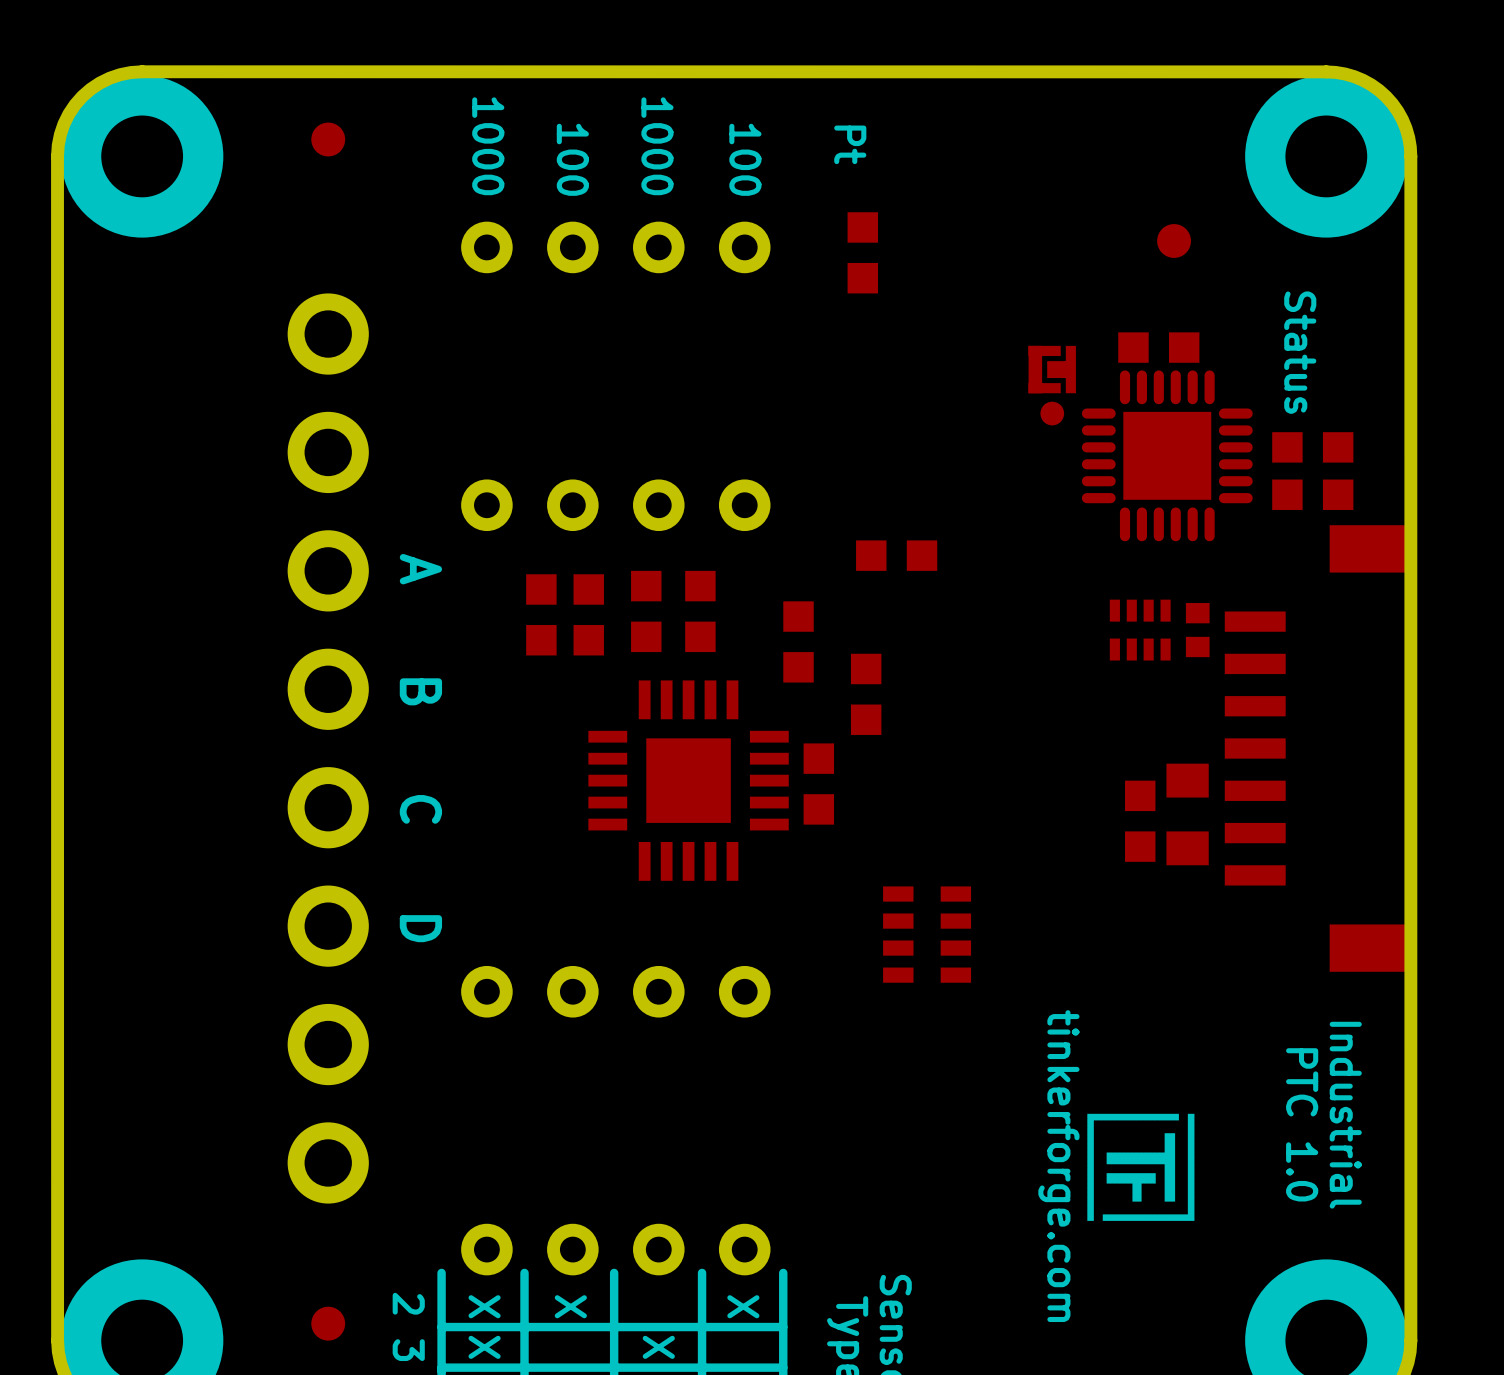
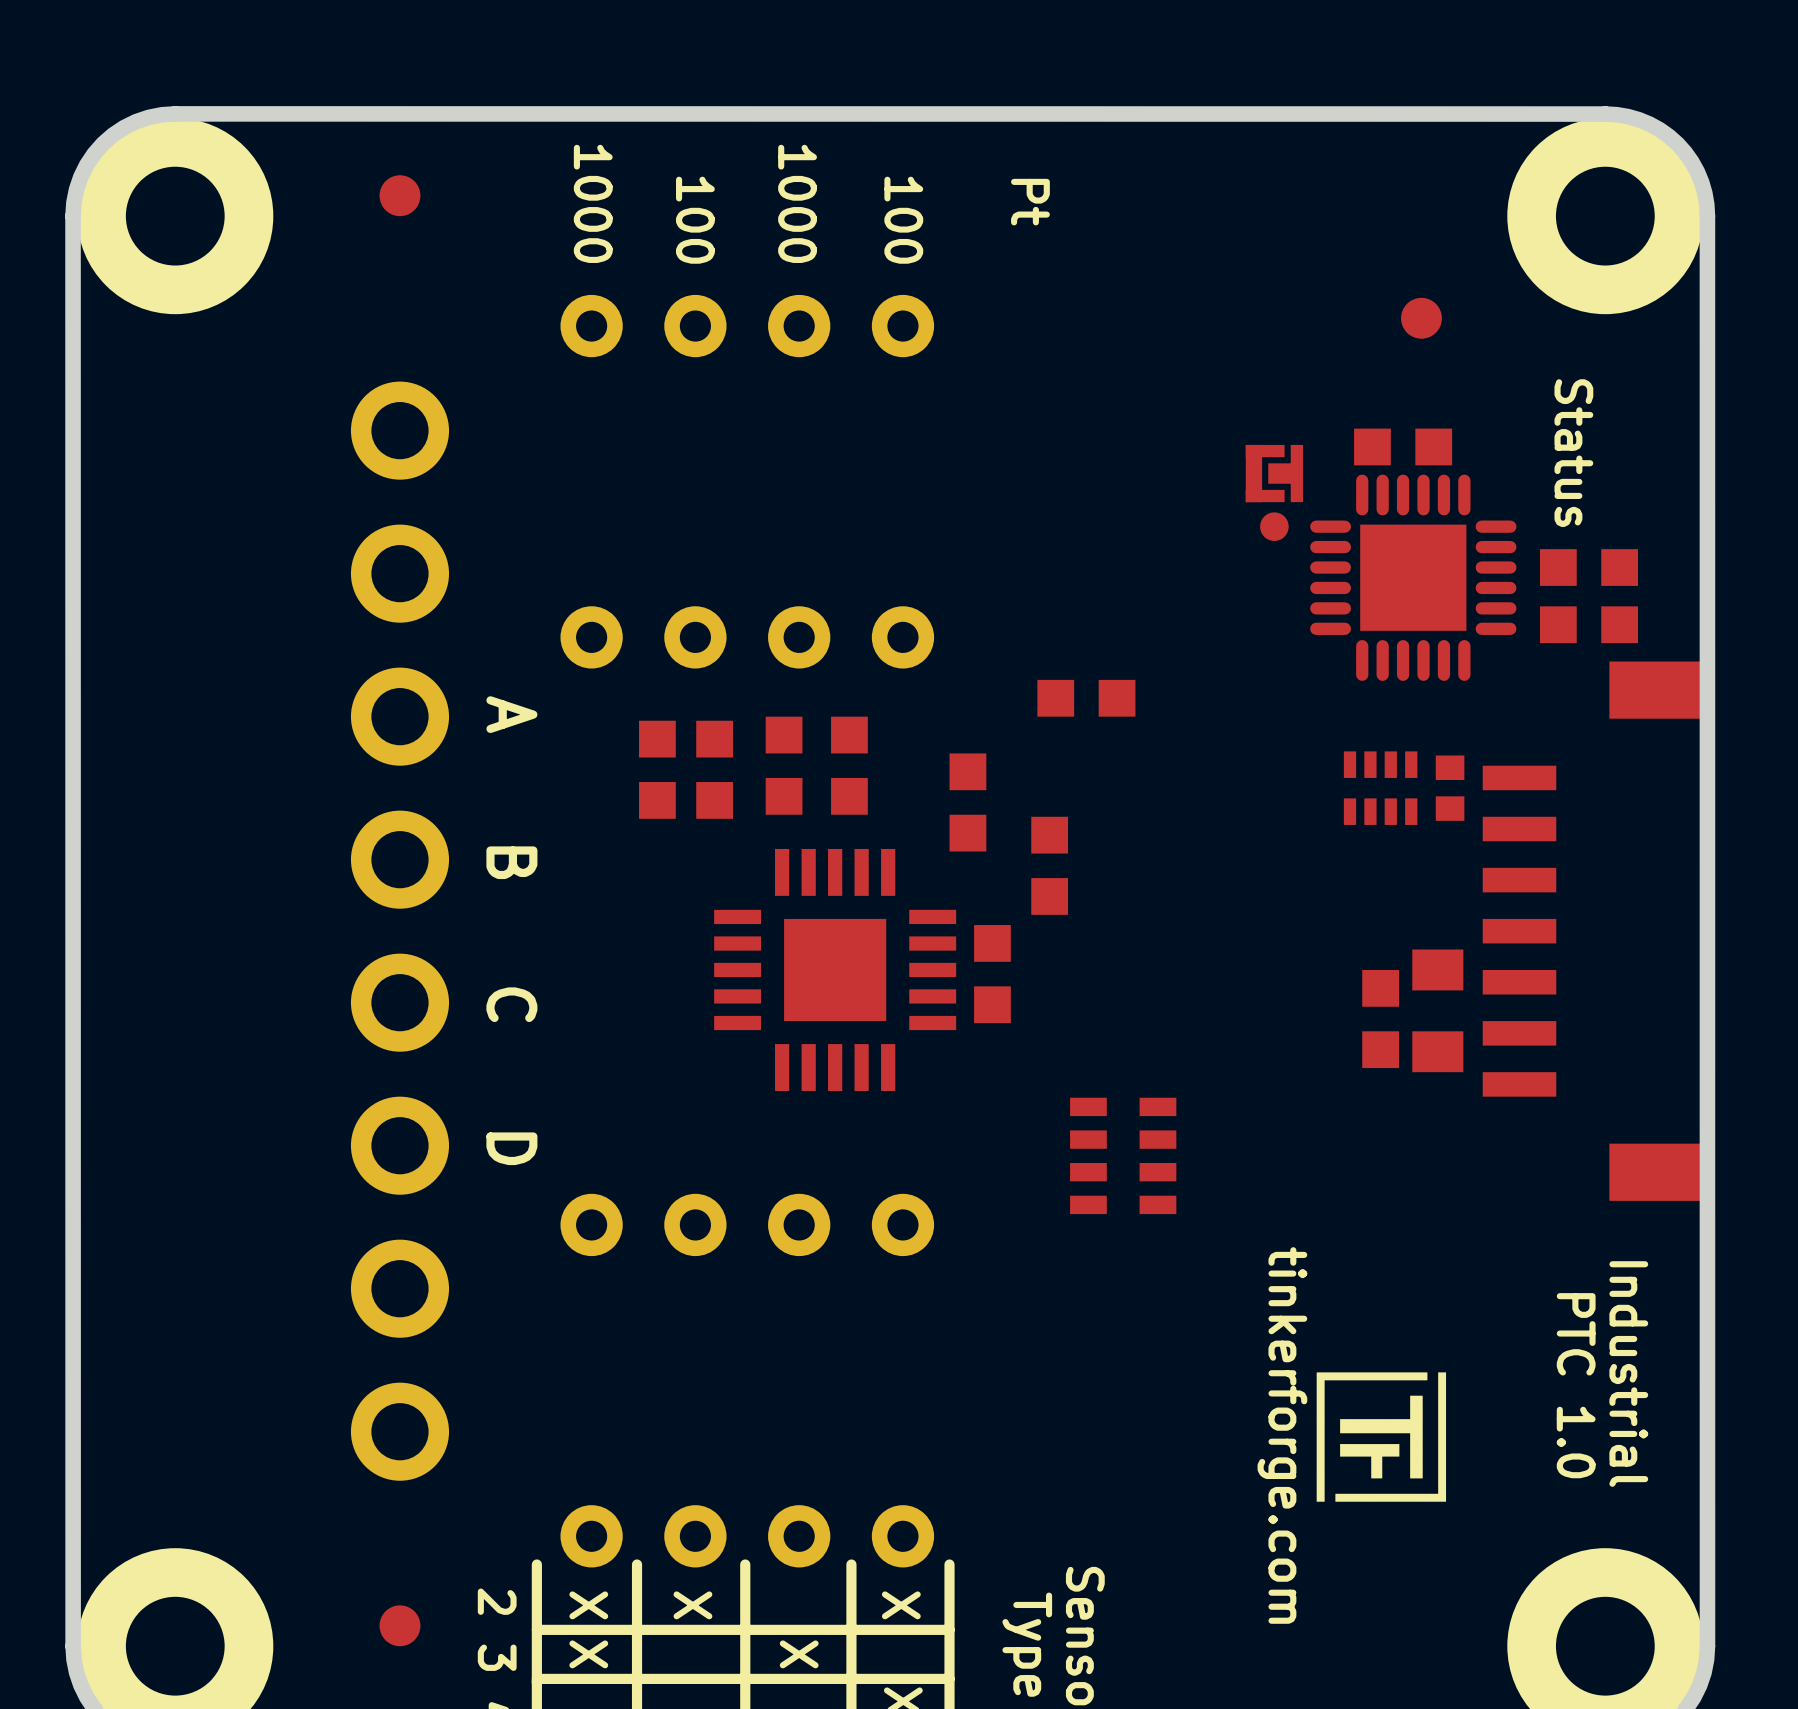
part: (862, 252) -> none

